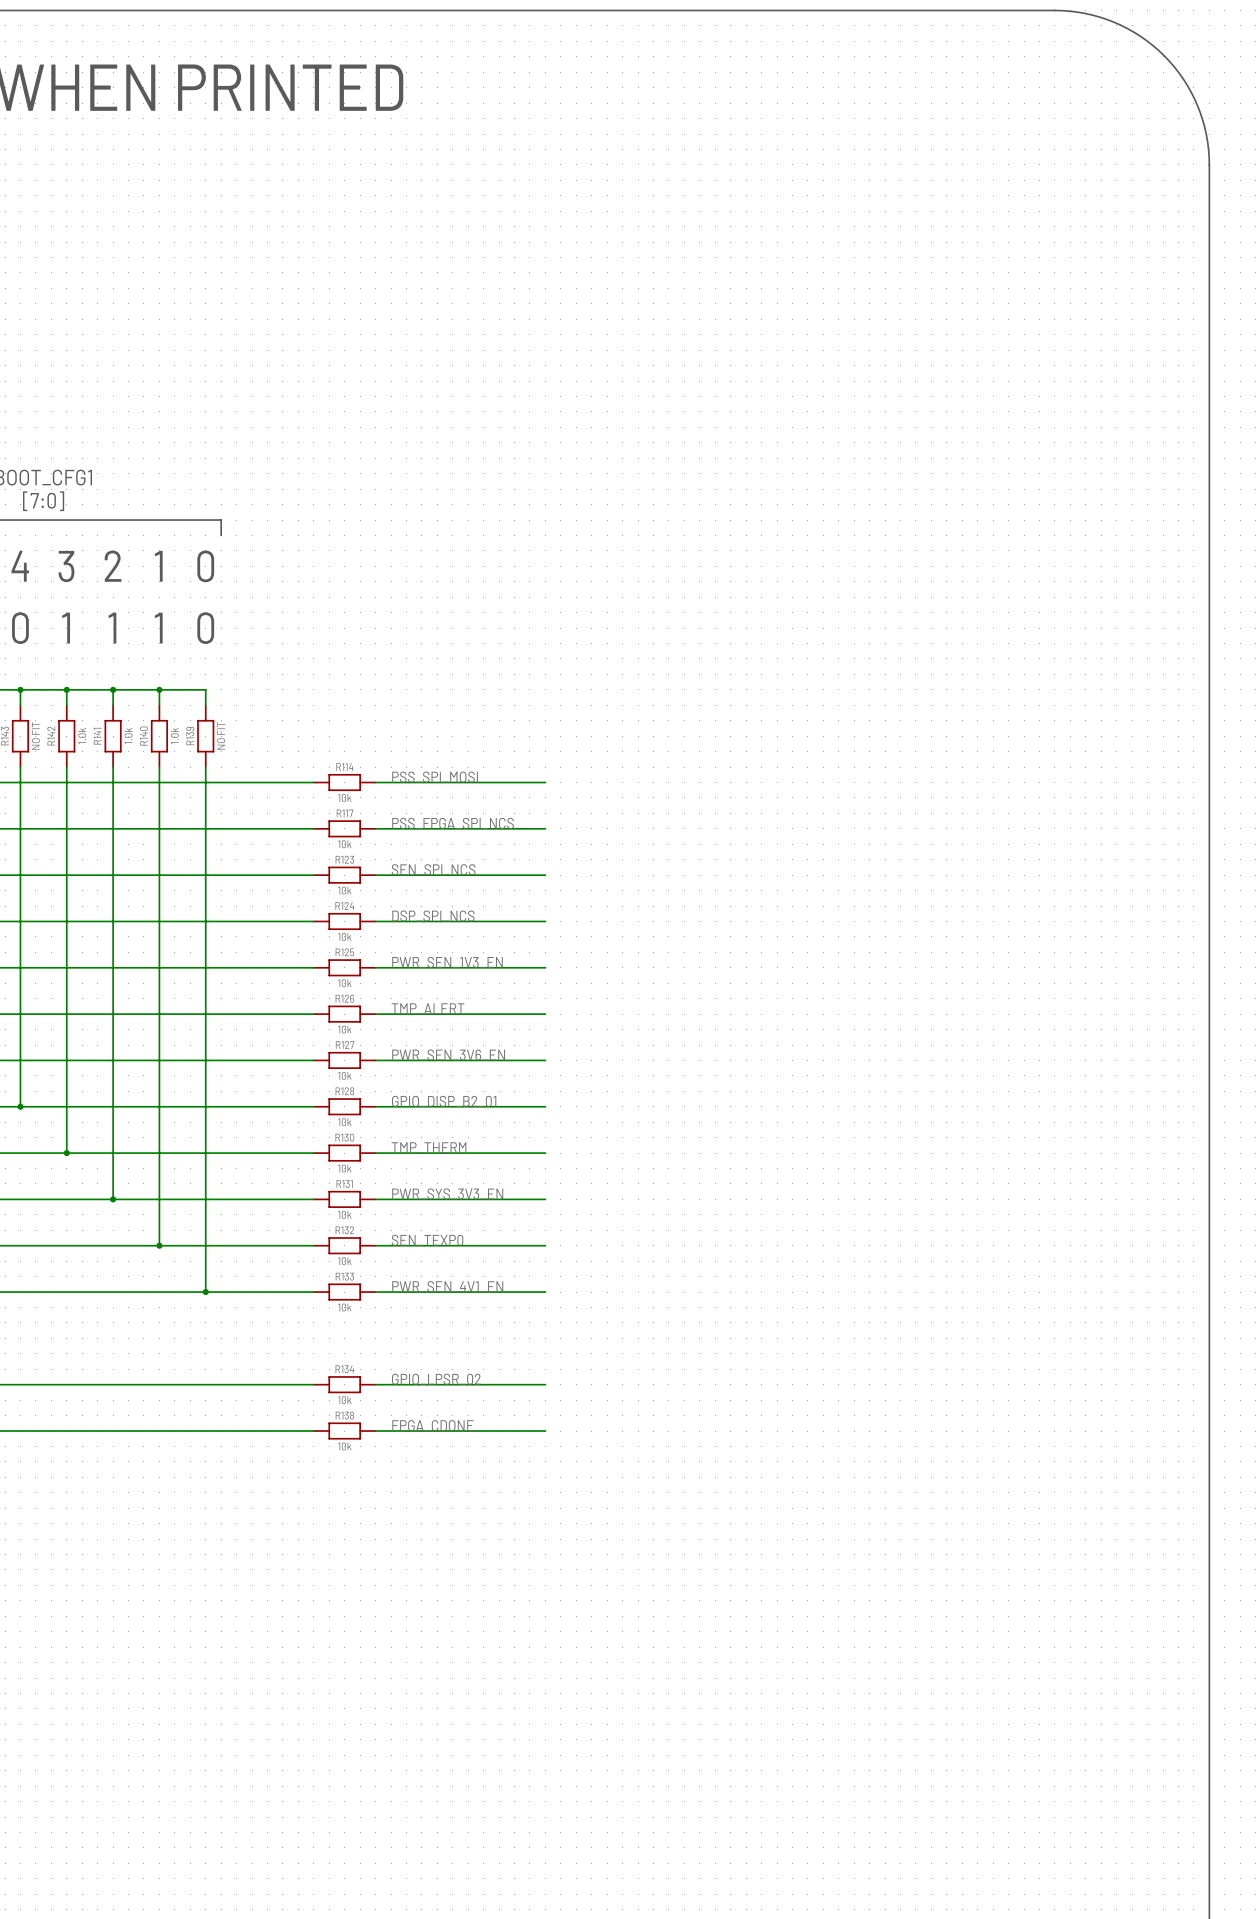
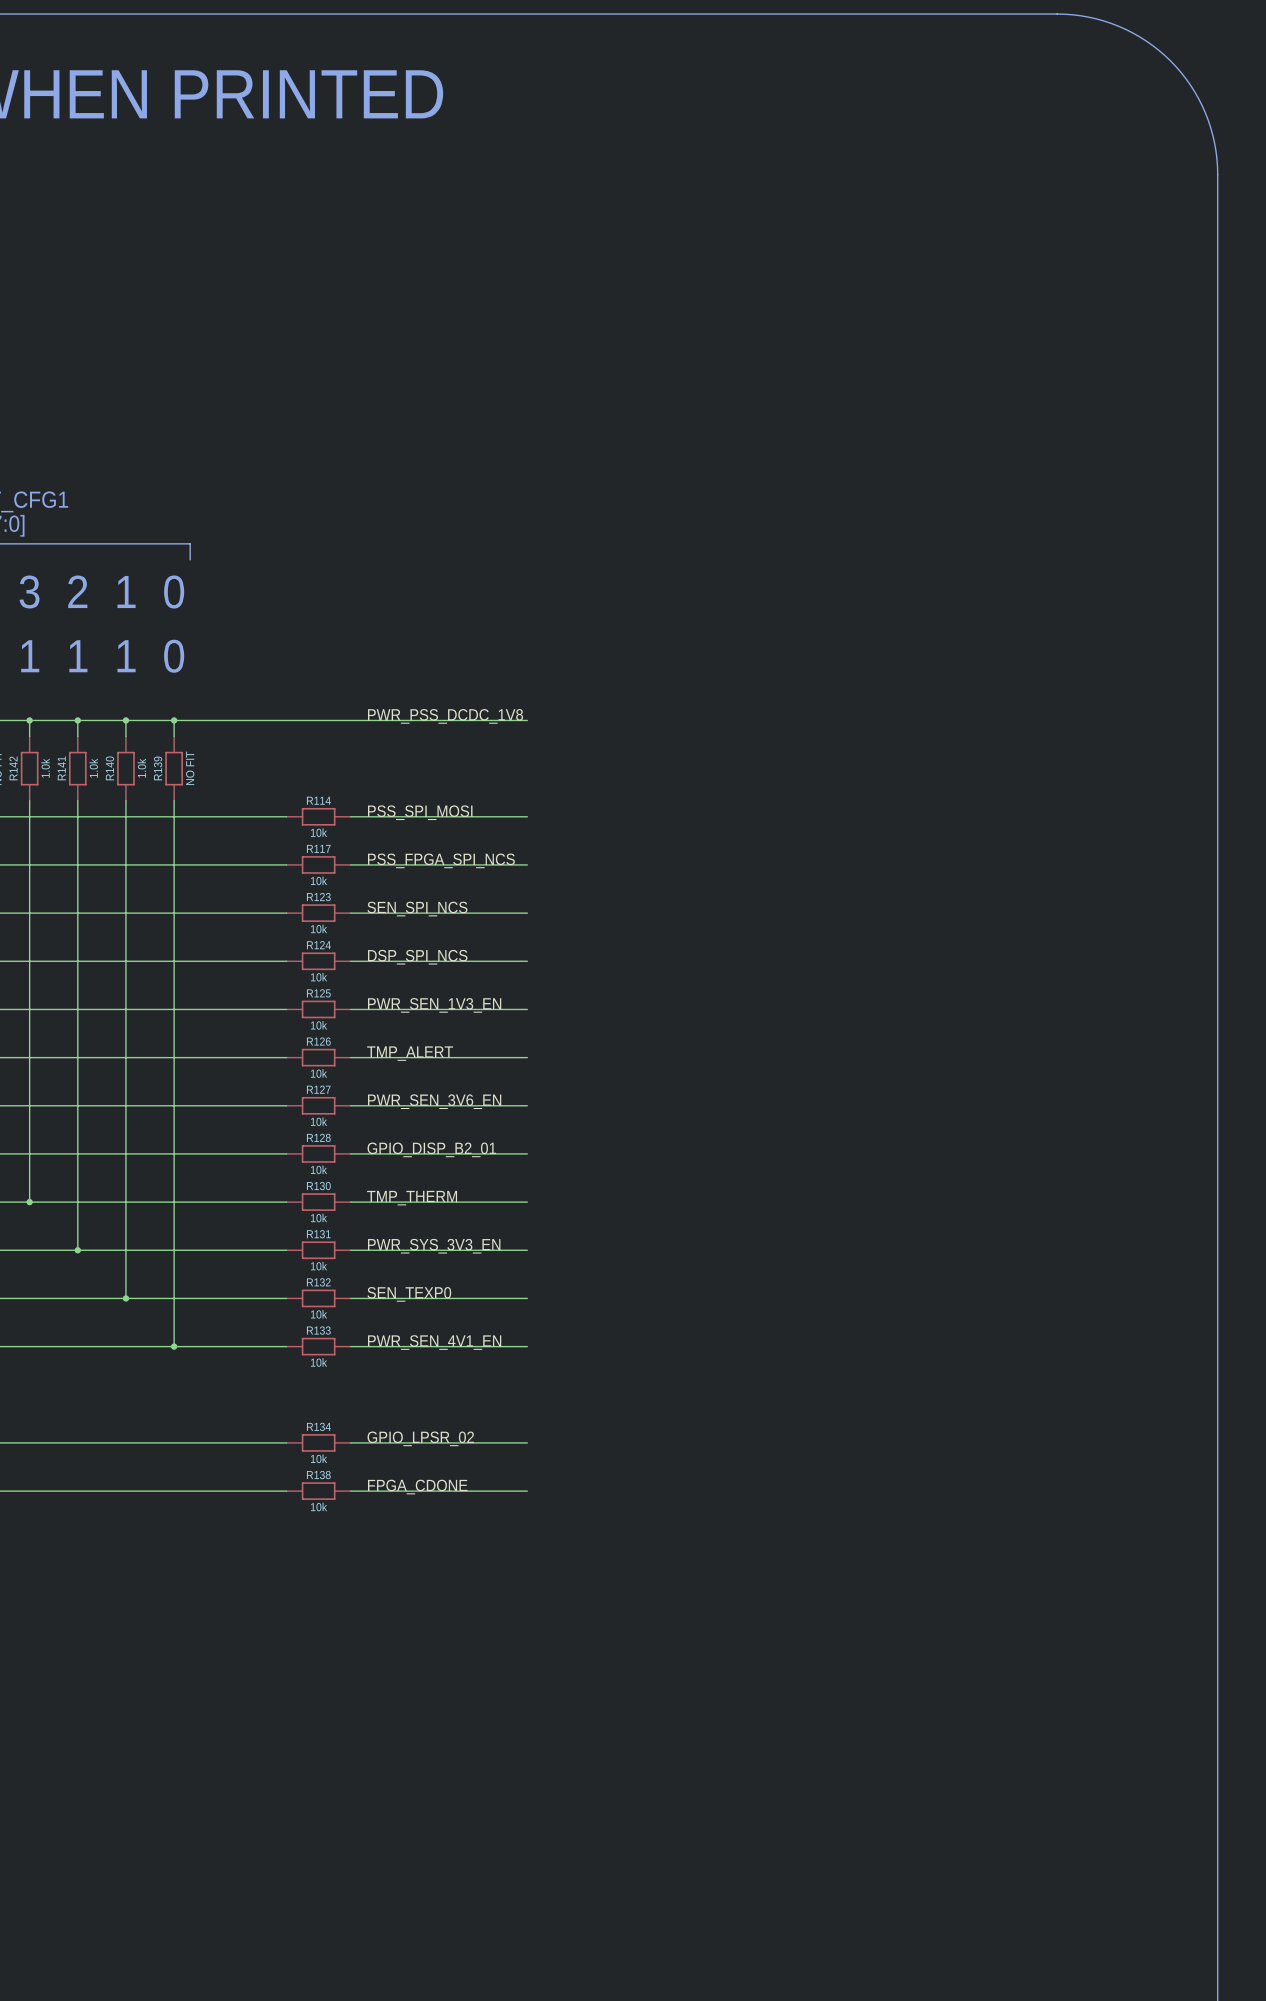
label: none -> PWR_PSS_DCDC_1V8 (445, 716)
wire: none -> (174, 720) (527, 720)
junction: none -> (174, 720)

